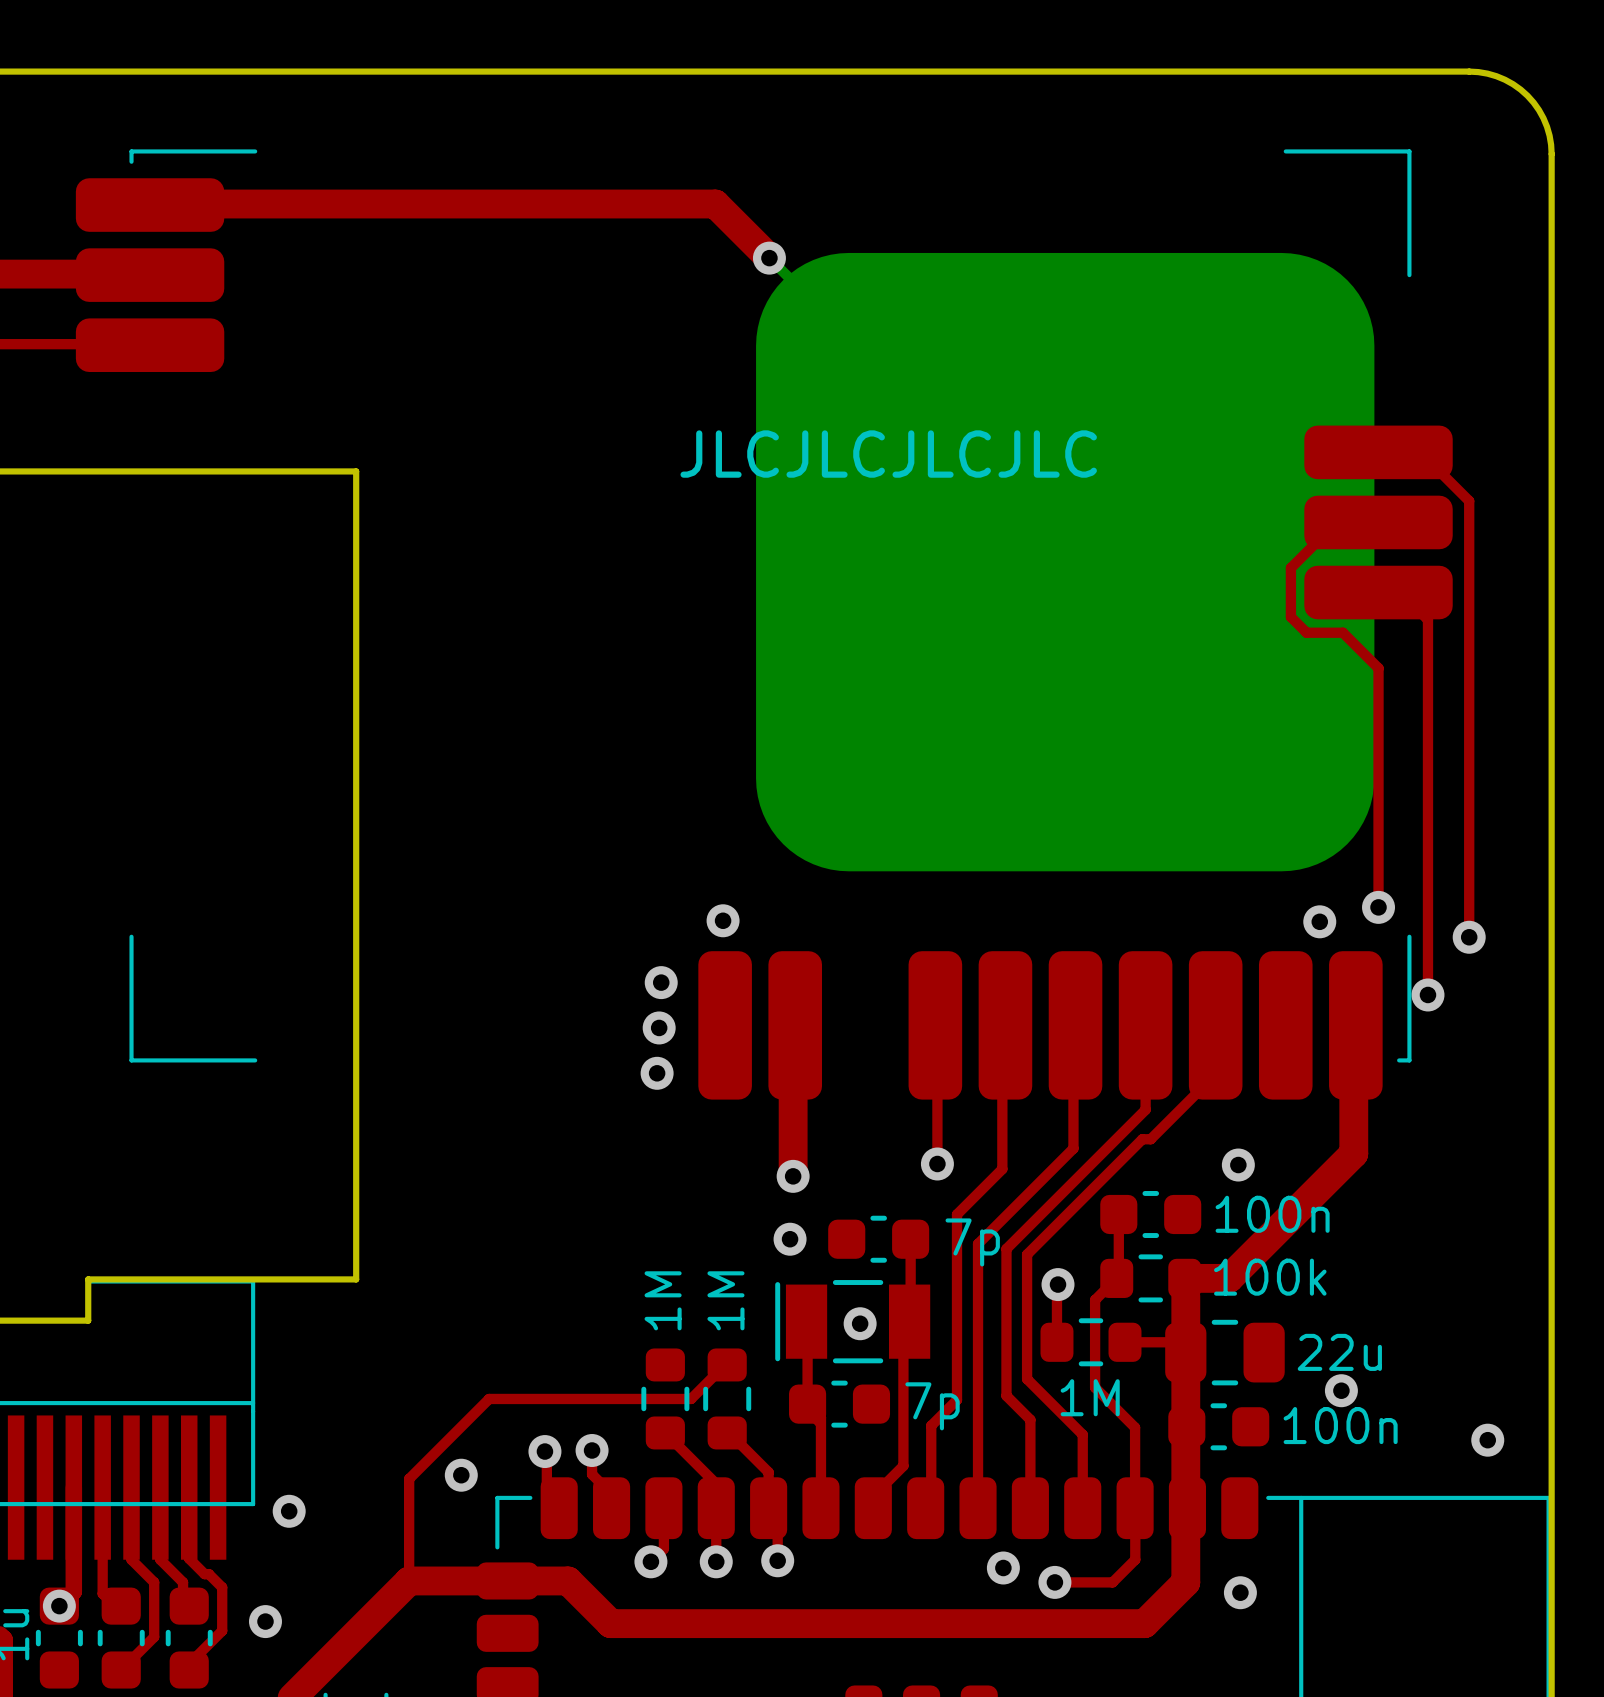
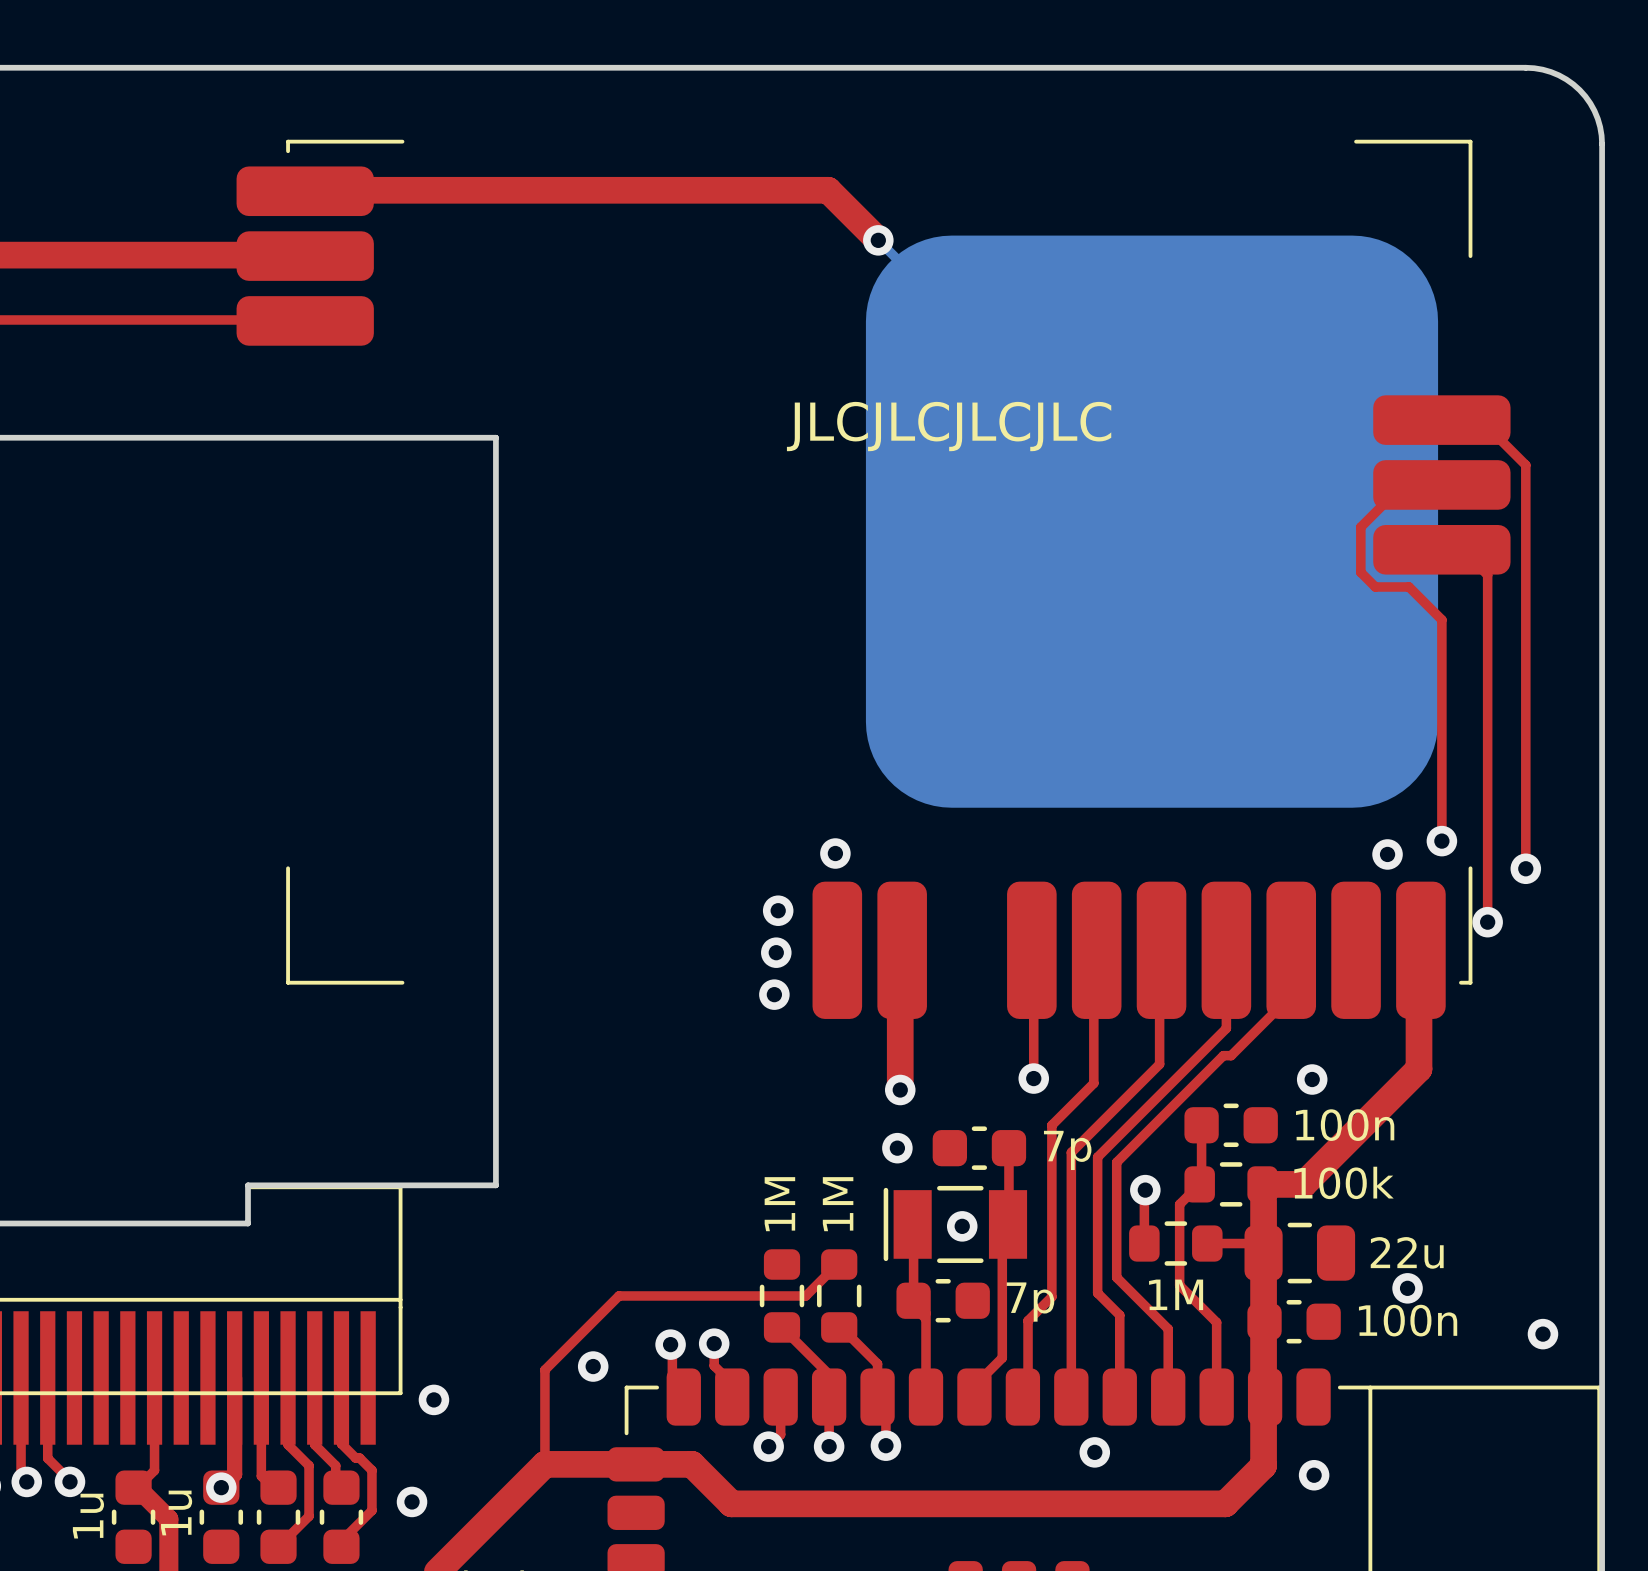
top track: (1135, 1528) (1135, 1559) (1112, 1582) (1054, 1582) -> none
via: (1054, 1582) -> none

